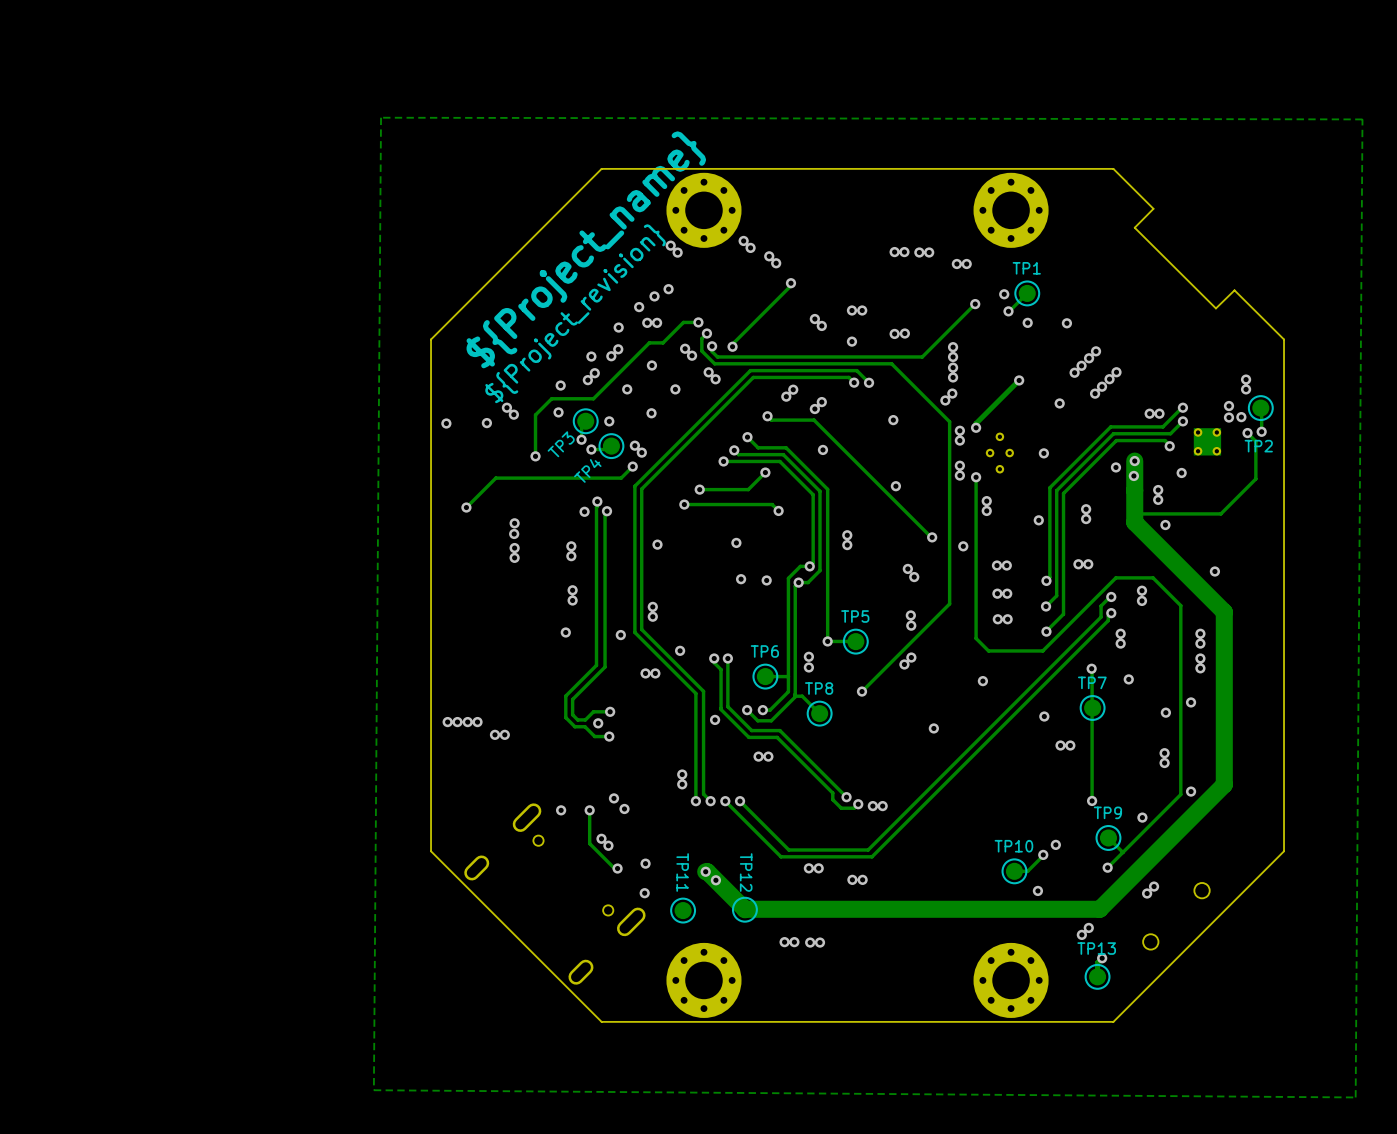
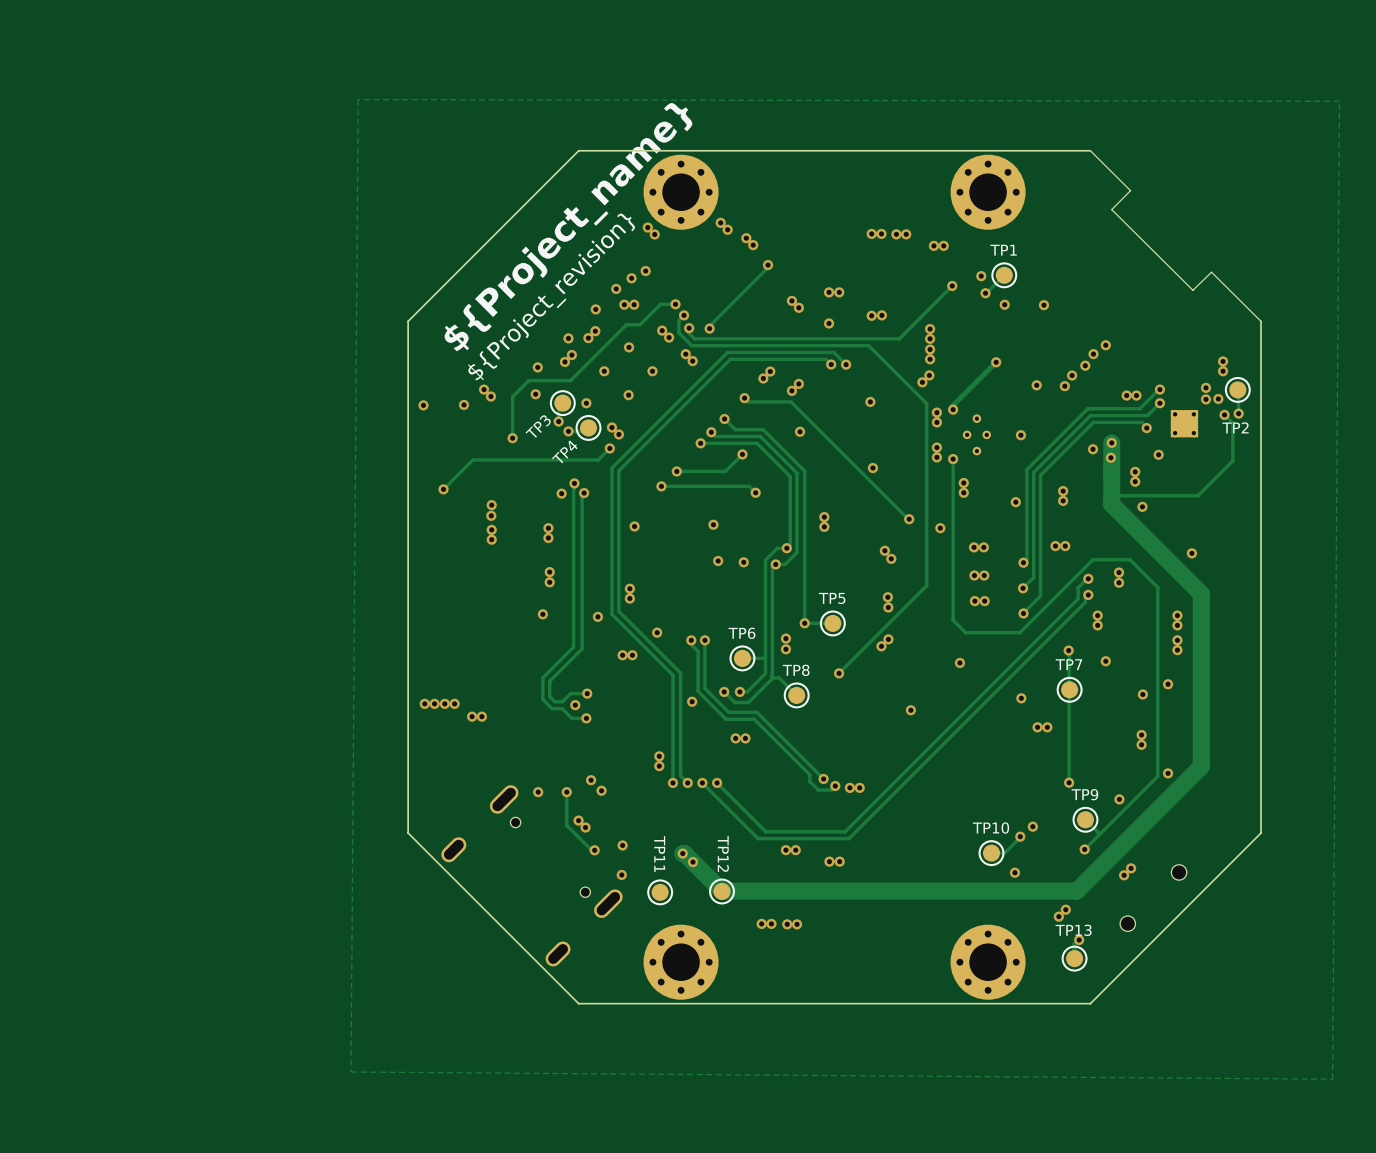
via: (1096, 351) -> none
via: (1089, 358) -> none
via: none -> (1105, 345)
via: (1081, 365) -> none
via: (1074, 372) -> none
via: (1109, 379) -> none
via: none -> (1085, 365)
via: (1102, 386) -> none
via: none -> (1064, 386)

